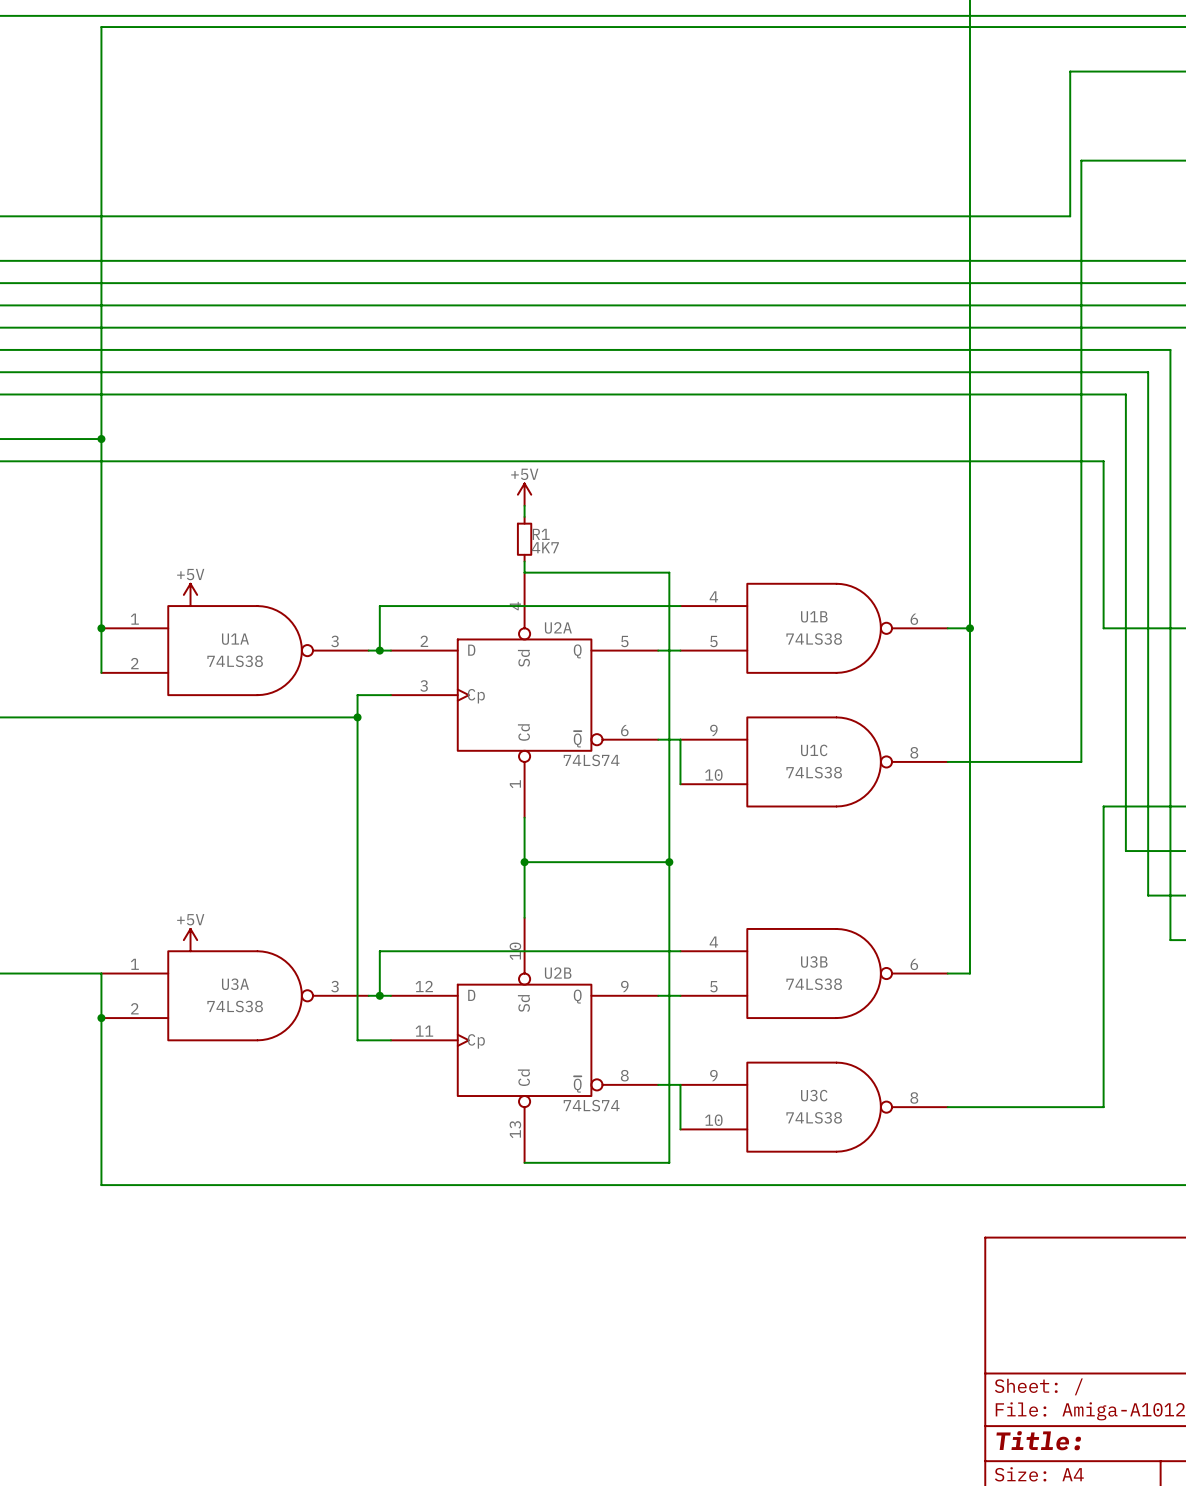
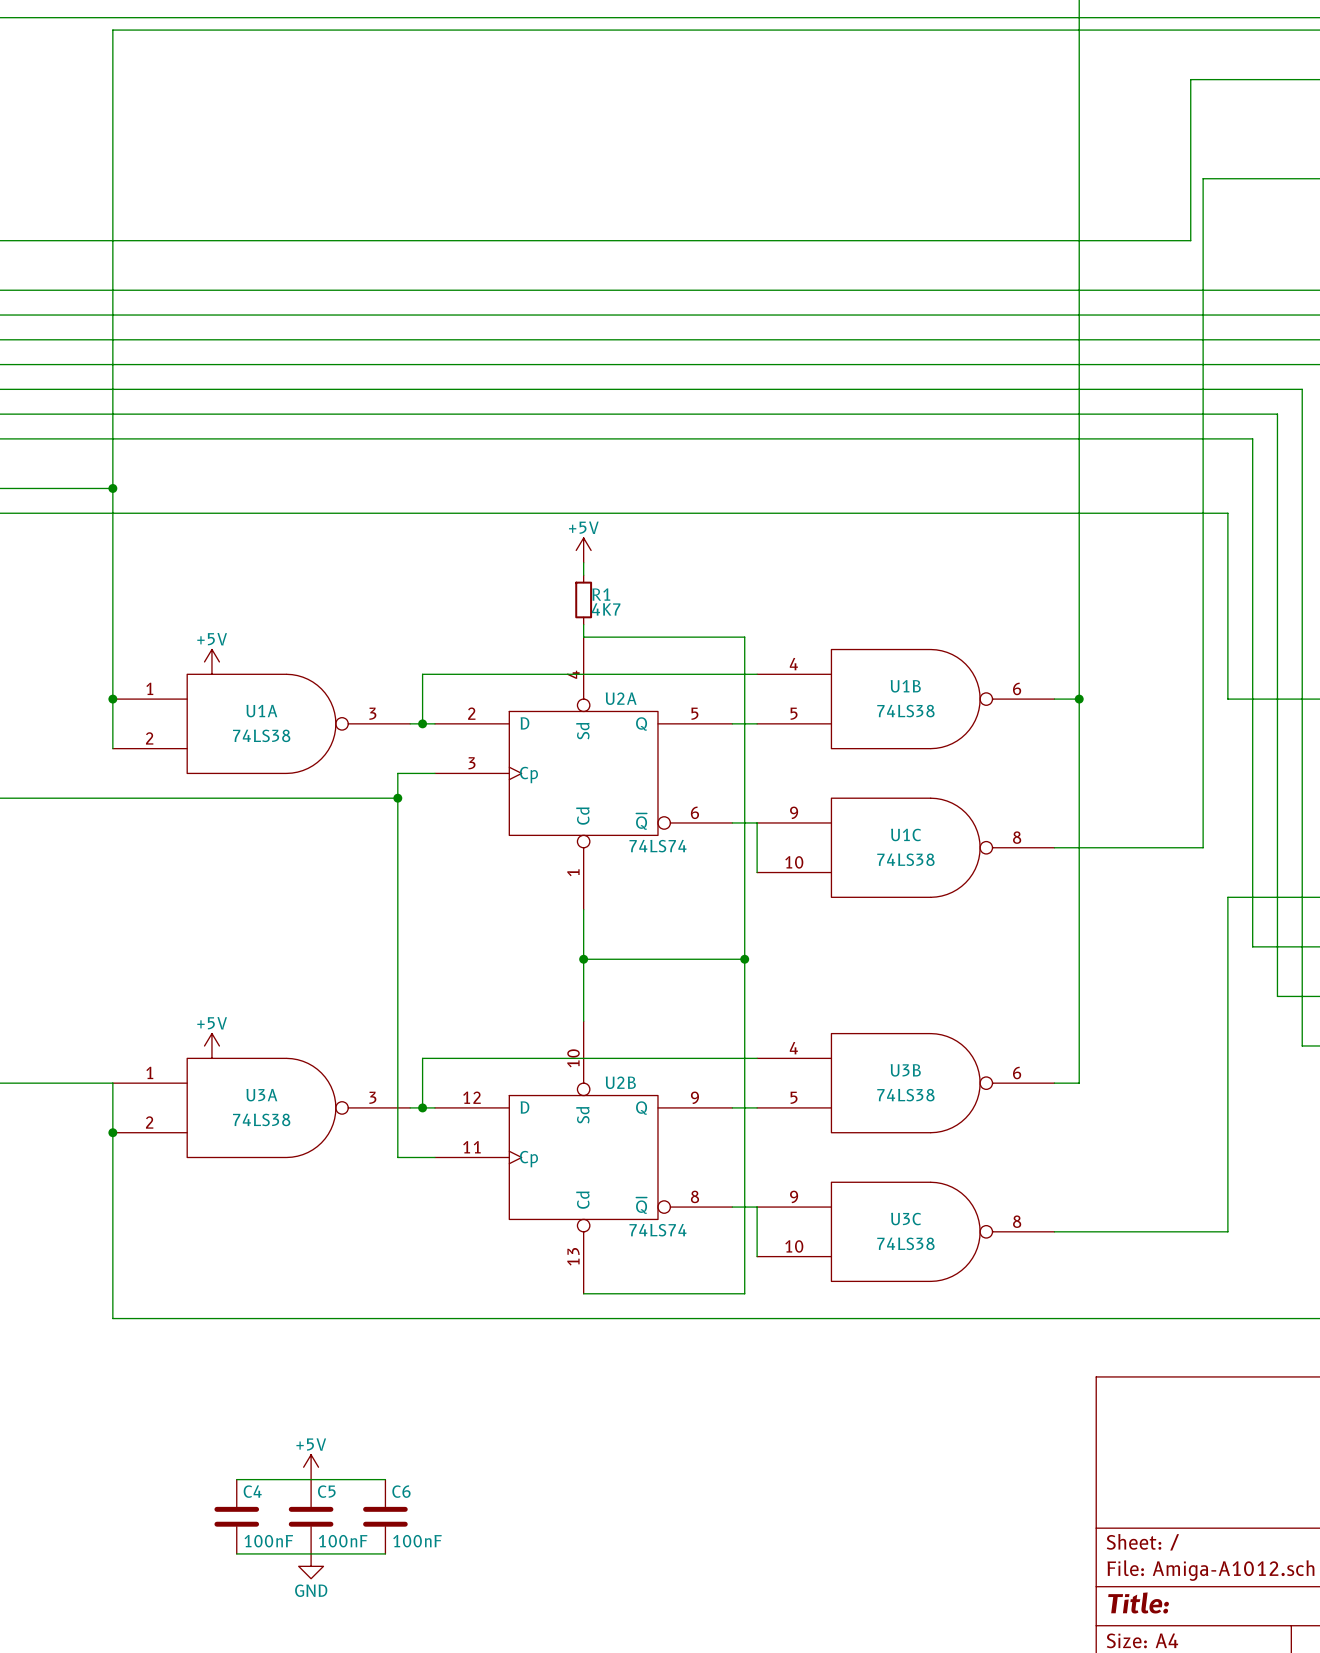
power symbol: none -> +5V (311, 1467)
wire: none -> (236, 1479) (385, 1479)
C4: none -> 100nF (236, 1516)
C5: none -> 100nF (311, 1516)
C6: none -> 100nF (385, 1516)
wire: none -> (236, 1553) (385, 1553)
power symbol: none -> GND (311, 1566)

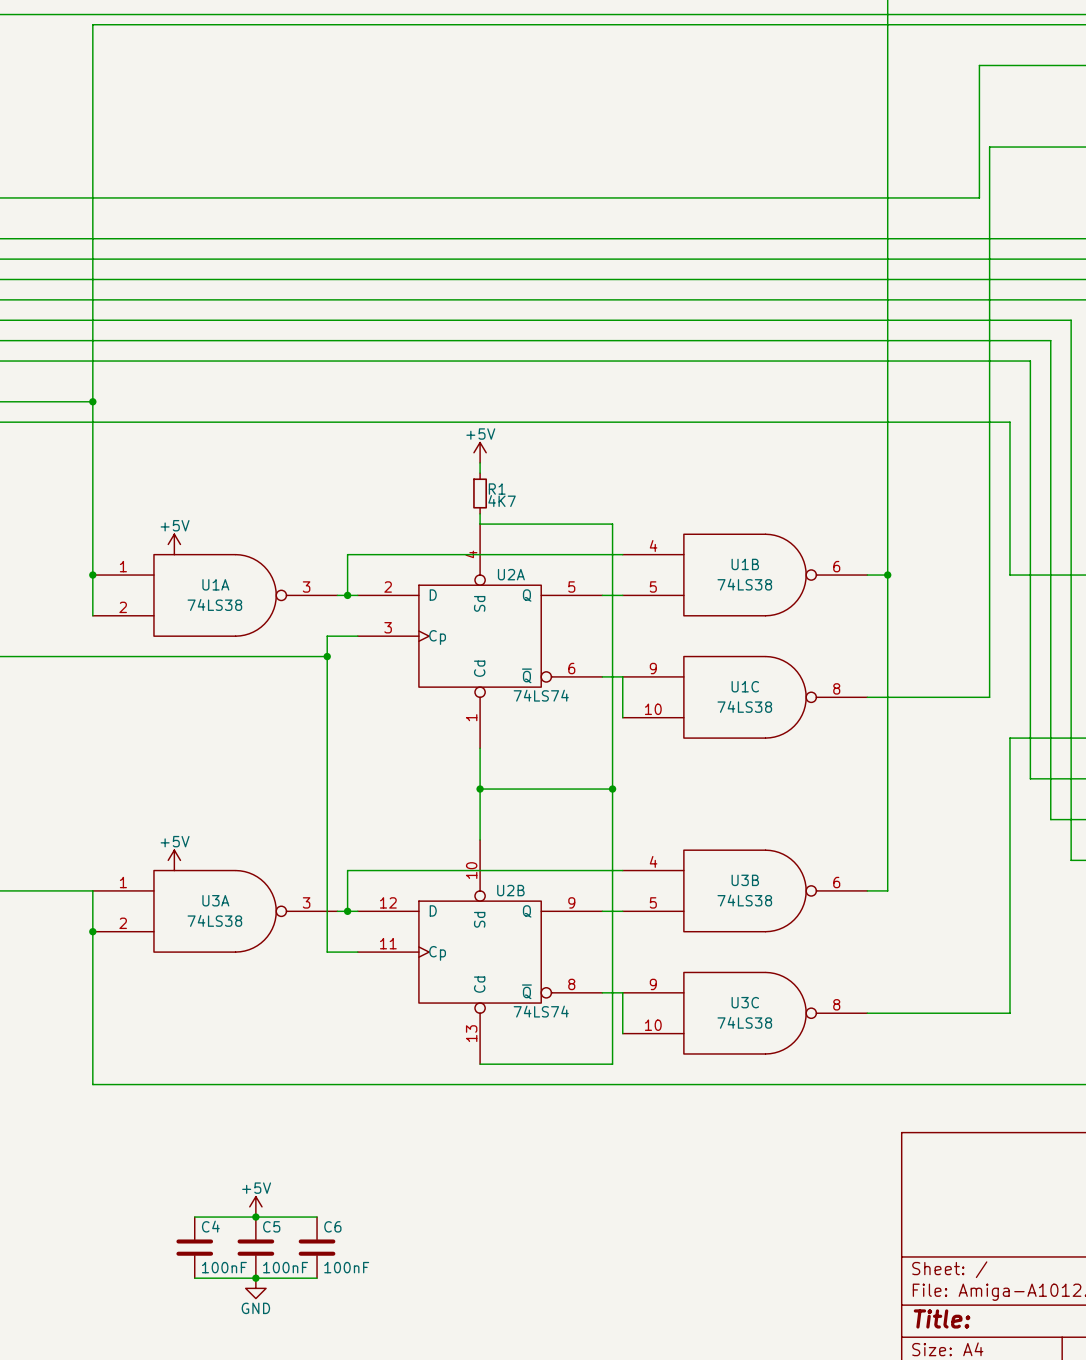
junction: none -> (255, 1217)
junction: none -> (255, 1278)

